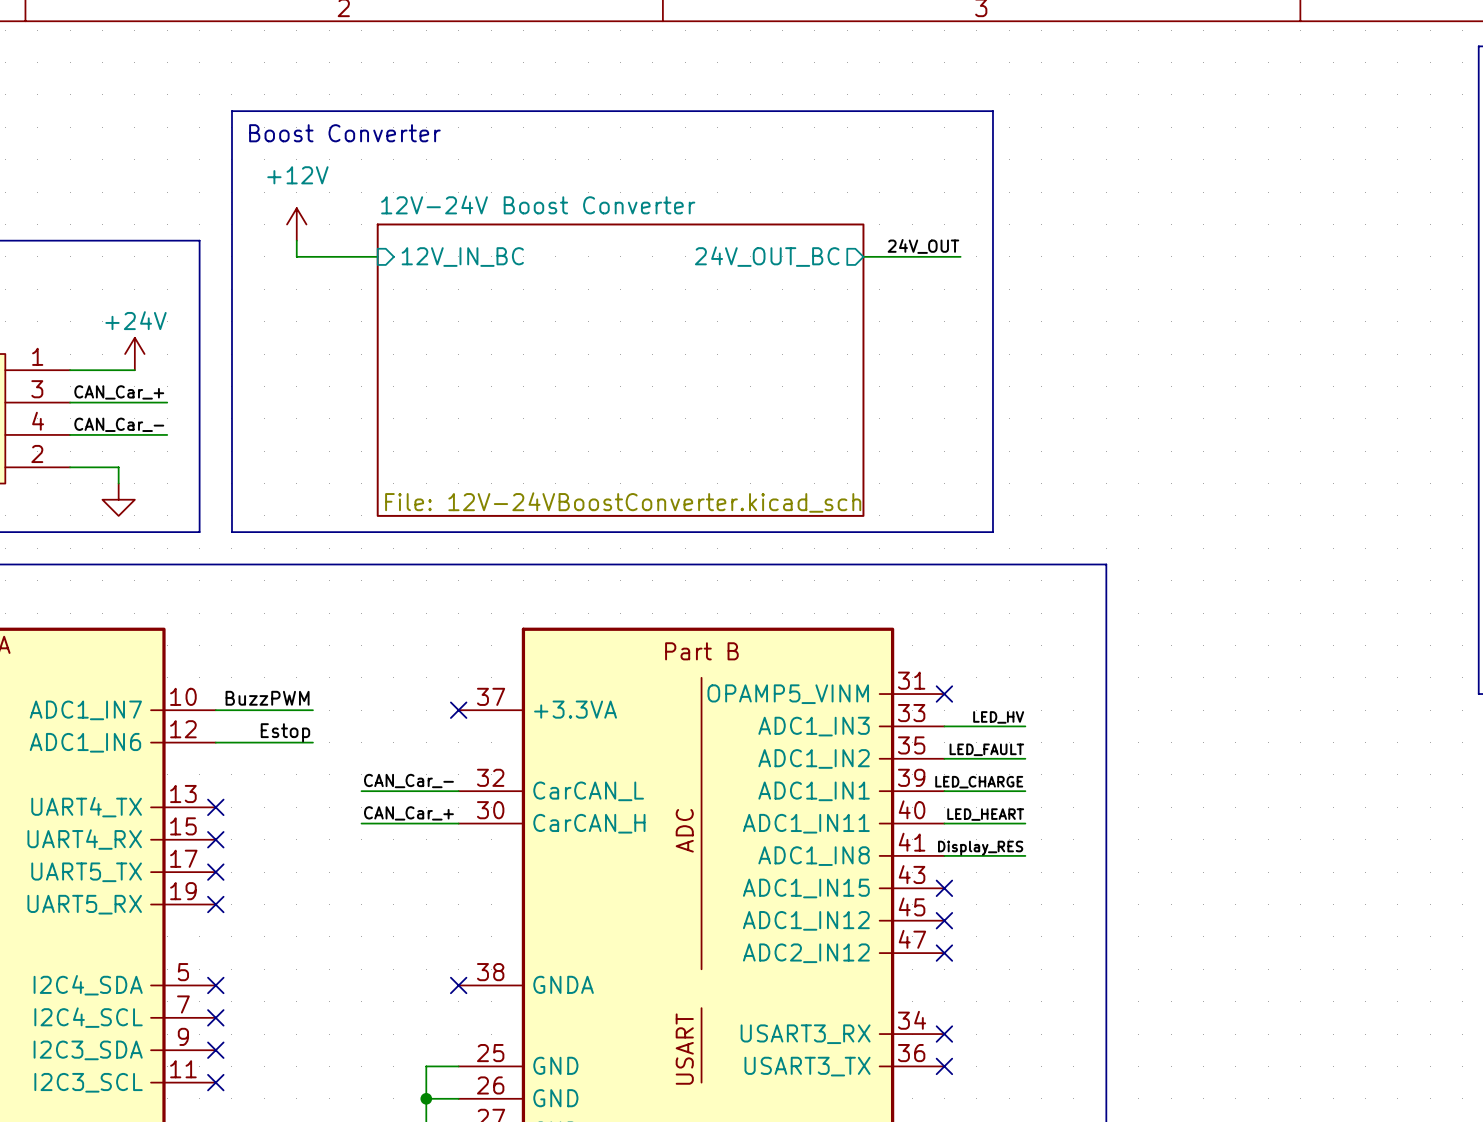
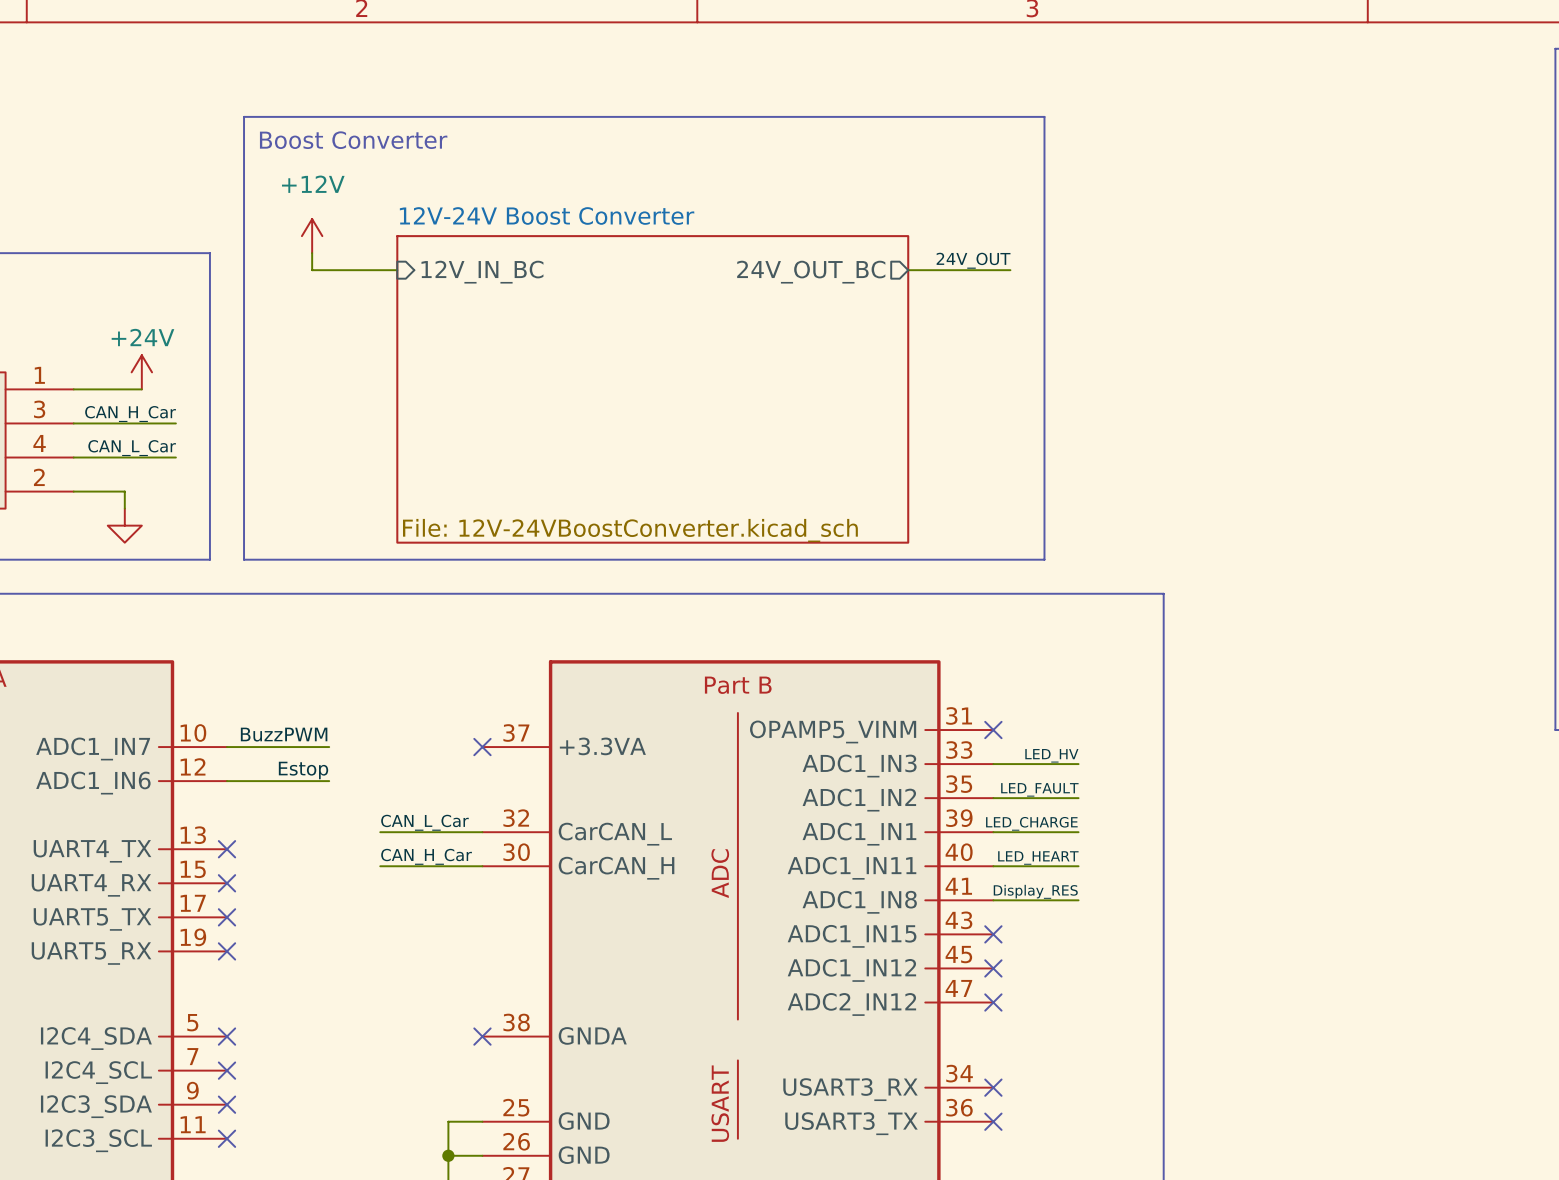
label: CAN_Car_+ (119, 392) -> CAN_H_Car (130, 414)
label: CAN_Car_- (119, 424) -> CAN_L_Car (132, 448)
label: CAN_Car_- (408, 781) -> CAN_L_Car (424, 822)
label: CAN_Car_+ (408, 813) -> CAN_H_Car (426, 856)

